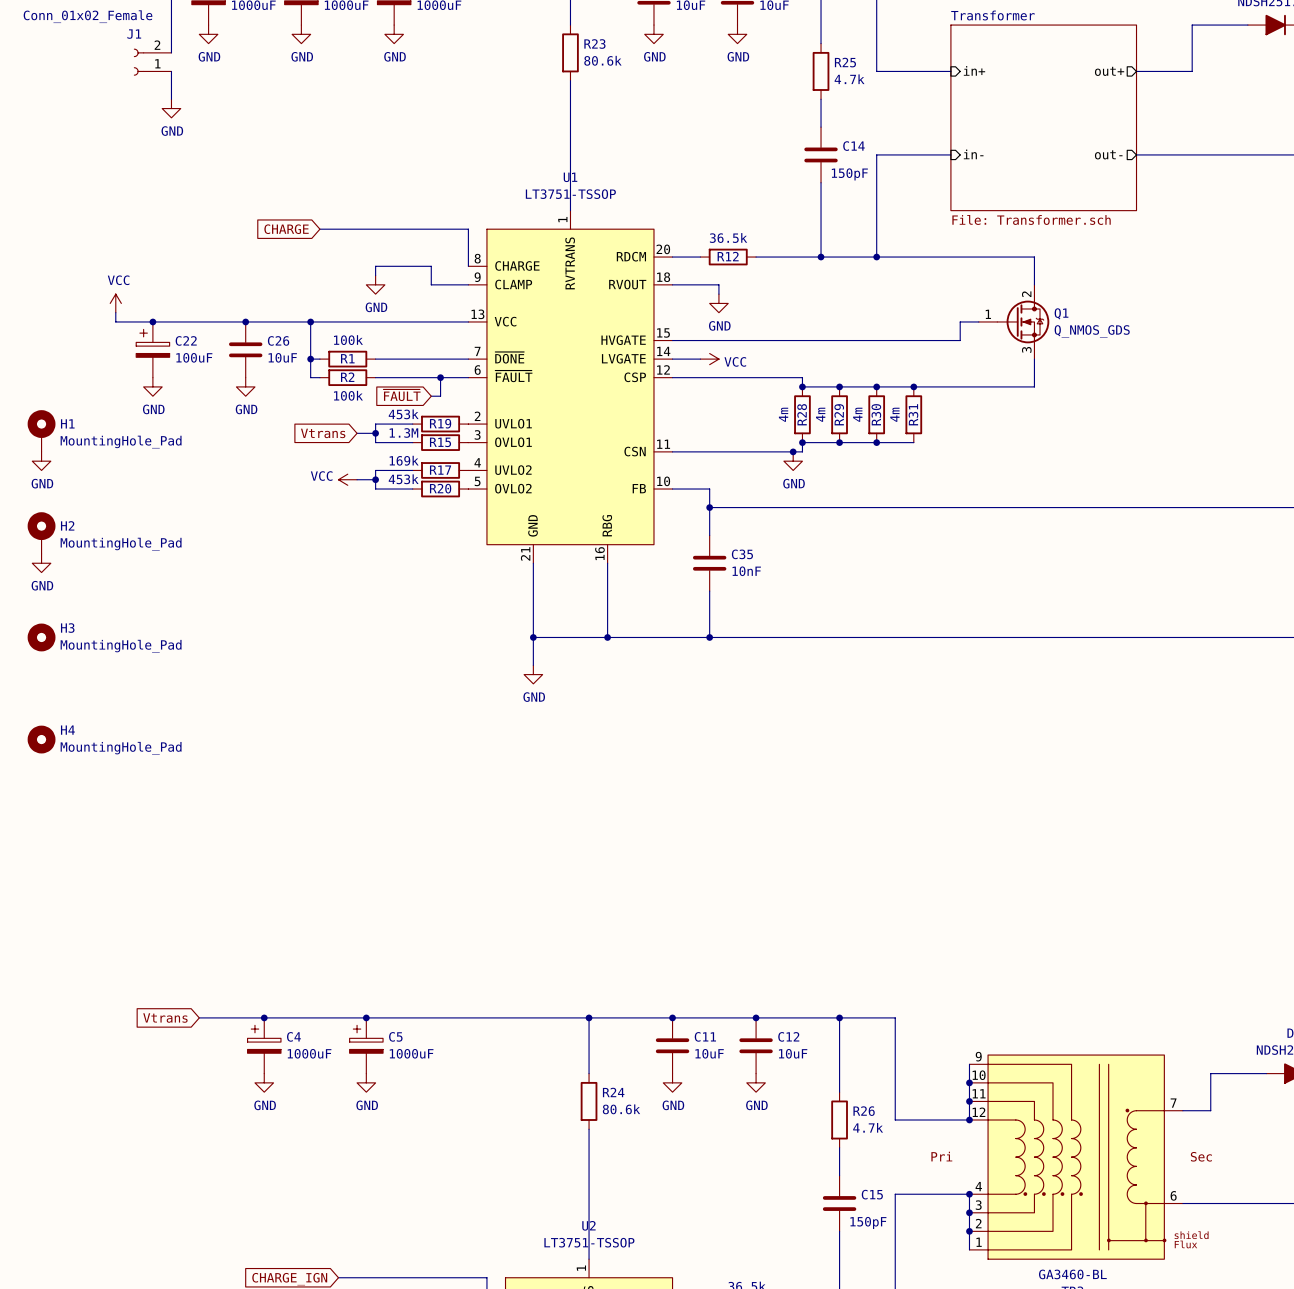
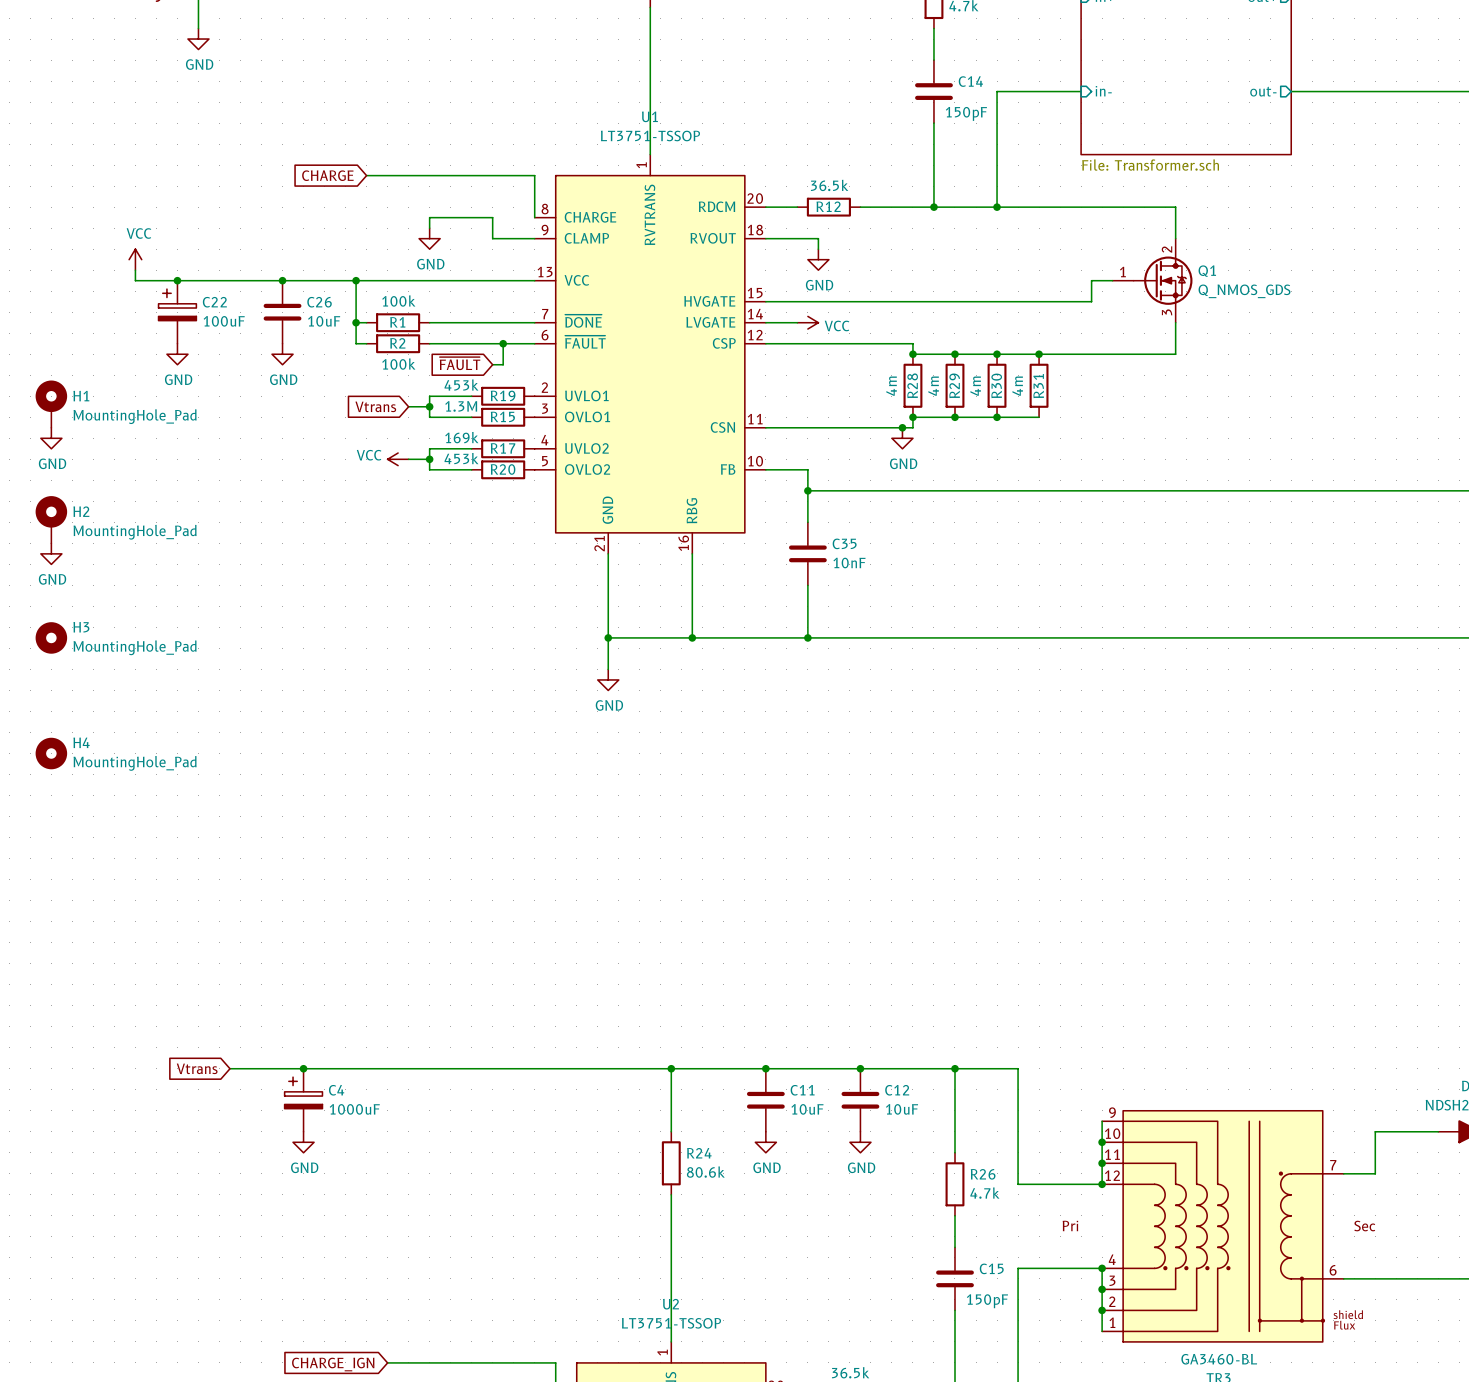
junction: (366, 1017) -> none
C5: 1000uF (366, 1045) -> none
power symbol: GND (366, 1082) -> none

